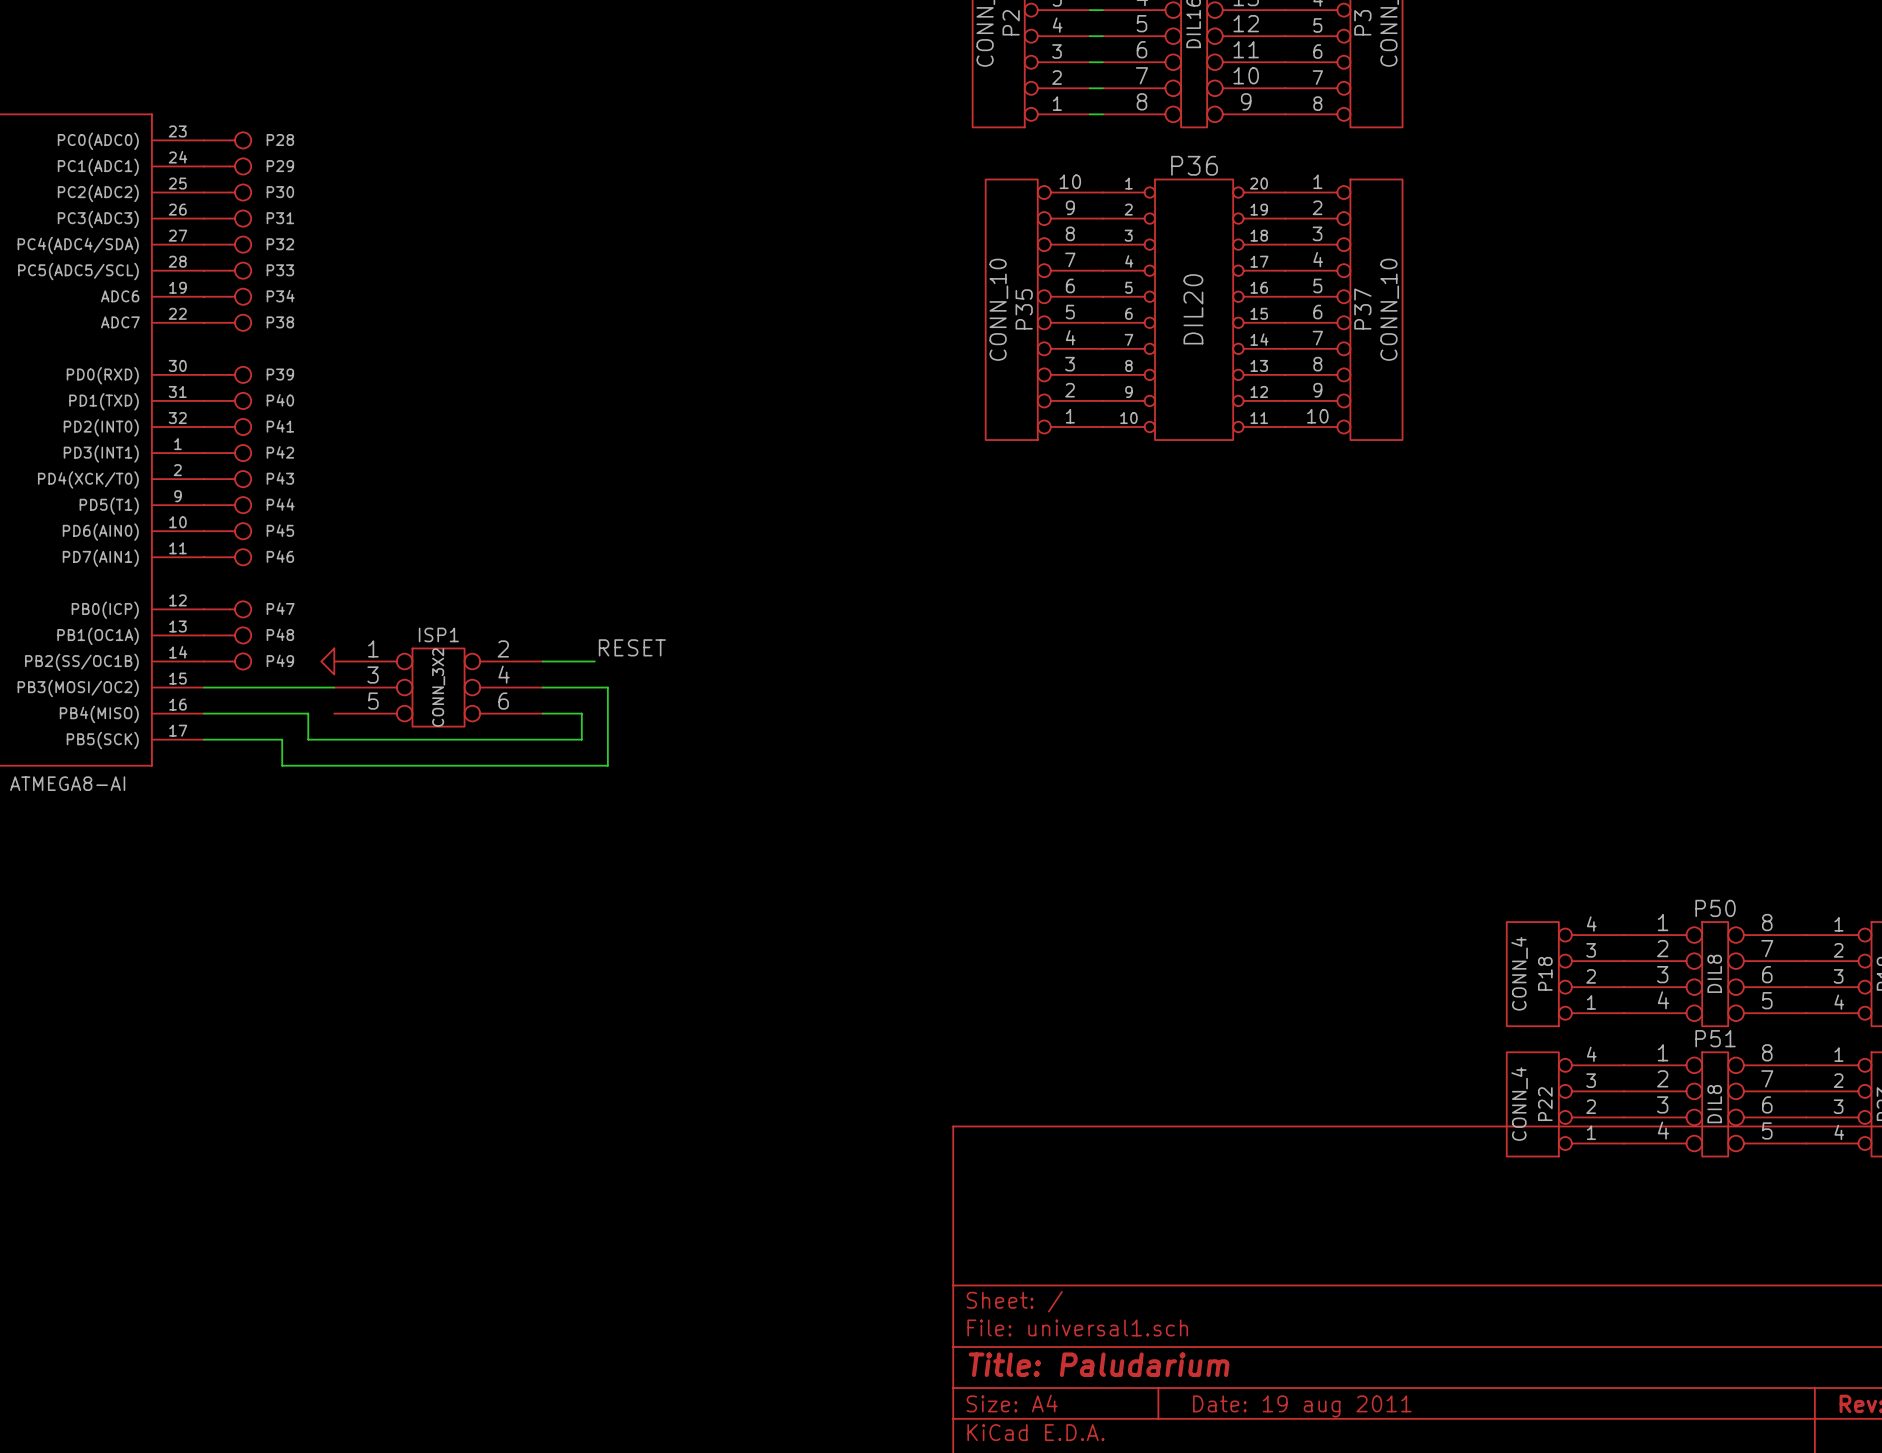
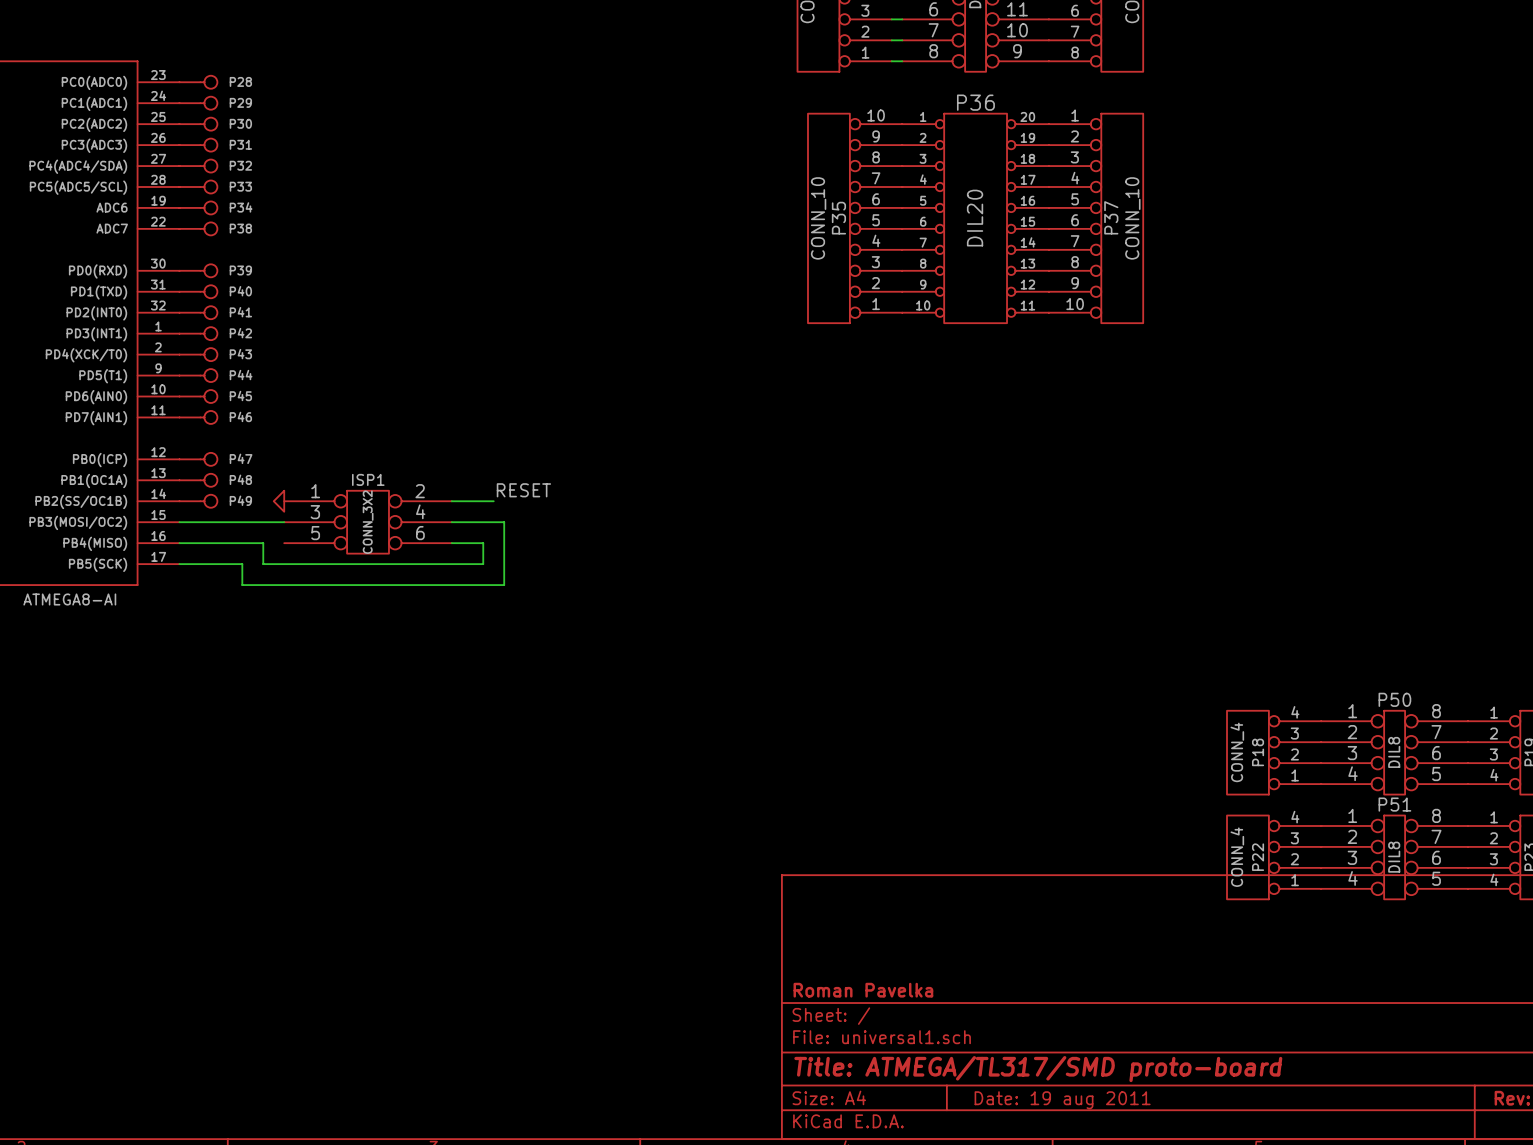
title block: none -> Roman Pavelka (863, 990)
title block: Title: Paludarium (1099, 1364) -> Title: ATMEGA/TL317/SMD proto-board (1038, 1069)

